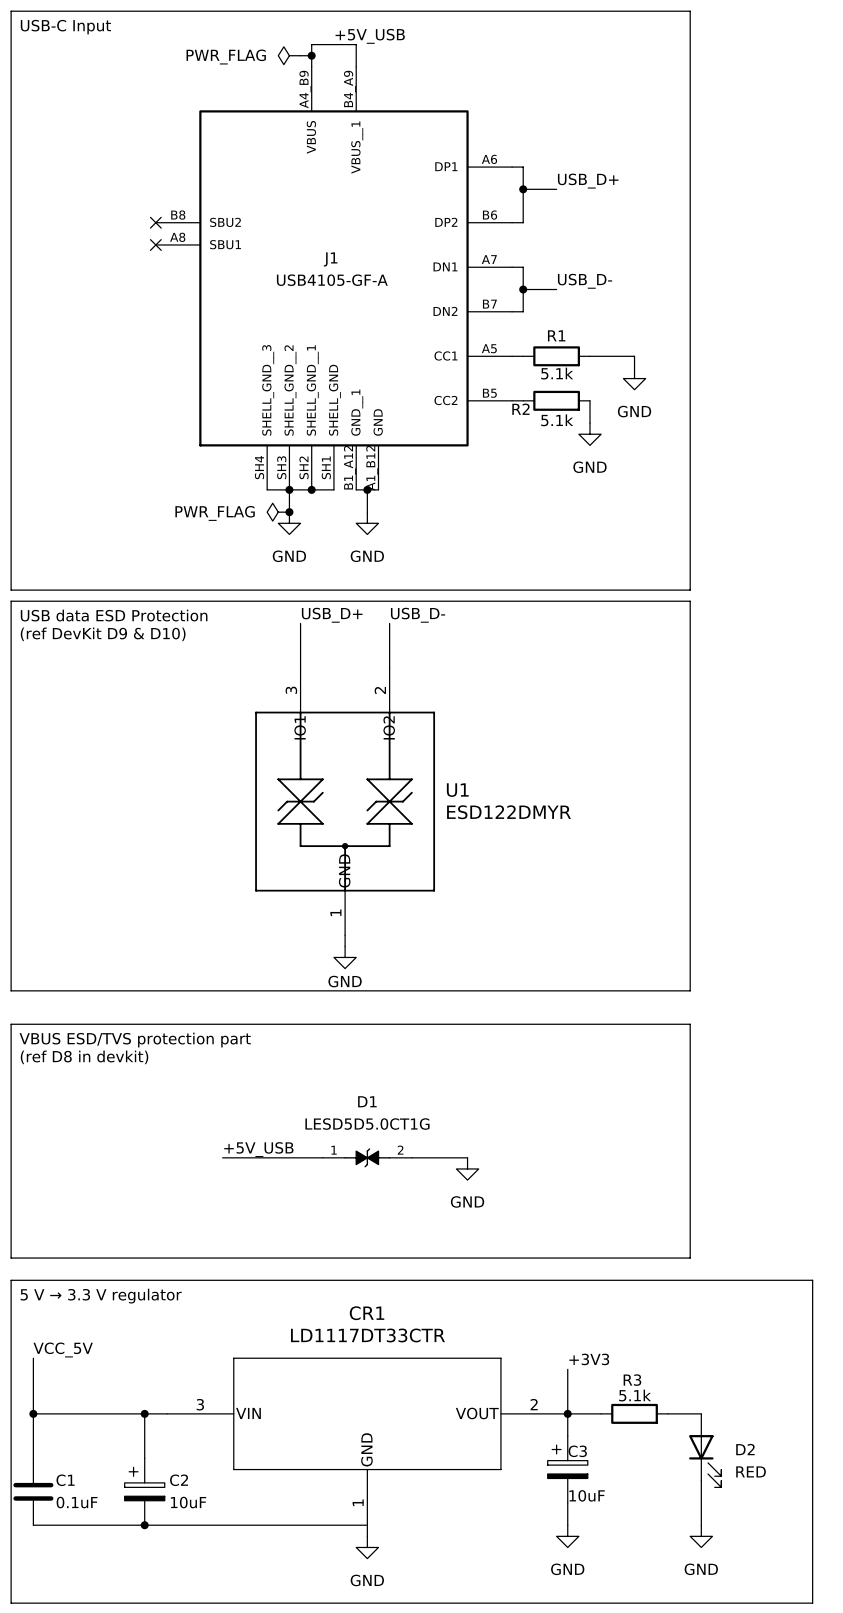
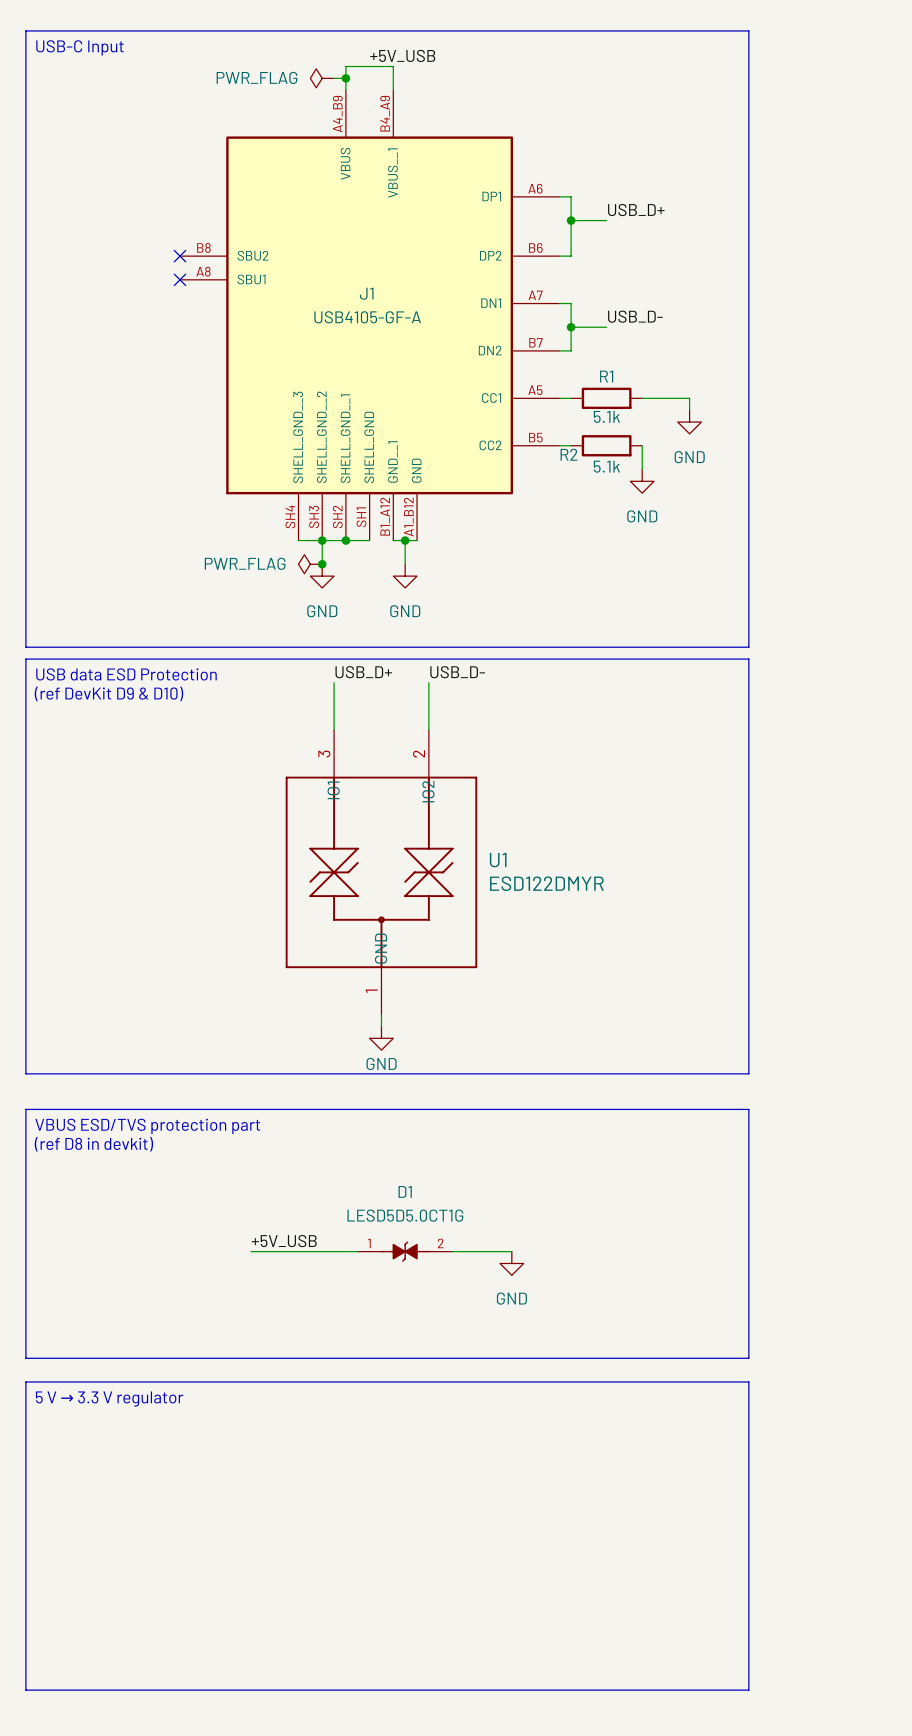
line: (690, 1280) (812, 1280) (812, 1603) (11, 1603) (11, 1569) -> (748, 1381) (748, 1690) (25, 1690)
label: VCC_5V (63, 1349) -> none
wire: (33, 1358) (33, 1458) -> none
label: +3V3 (589, 1359) -> none
wire: (567, 1369) (567, 1436) -> none
wire: (33, 1413) (166, 1413) -> none
junction: (33, 1413) -> none
wire: (144, 1413) (144, 1458) -> none
junction: (144, 1413) -> none
wire: (567, 1413) (601, 1413) -> none
junction: (567, 1413) -> none
R3: 5.1k (634, 1413) -> none
wire: (667, 1413) (701, 1413) -> none
CR1: LD1117DT33CTR (367, 1447) -> none
D2: RED (705, 1450) -> none
C3: 10uF (567, 1469) -> none
wire: (701, 1480) (701, 1525) -> none
C1: 0.1uF (33, 1491) -> none
C2: 10uF (144, 1491) -> none
wire: (567, 1502) (567, 1525) -> none
wire: (33, 1525) (367, 1525) -> none
junction: (144, 1525) -> none
power symbol: GND (567, 1536) -> none
power symbol: GND (701, 1536) -> none
power symbol: GND (367, 1547) -> none

